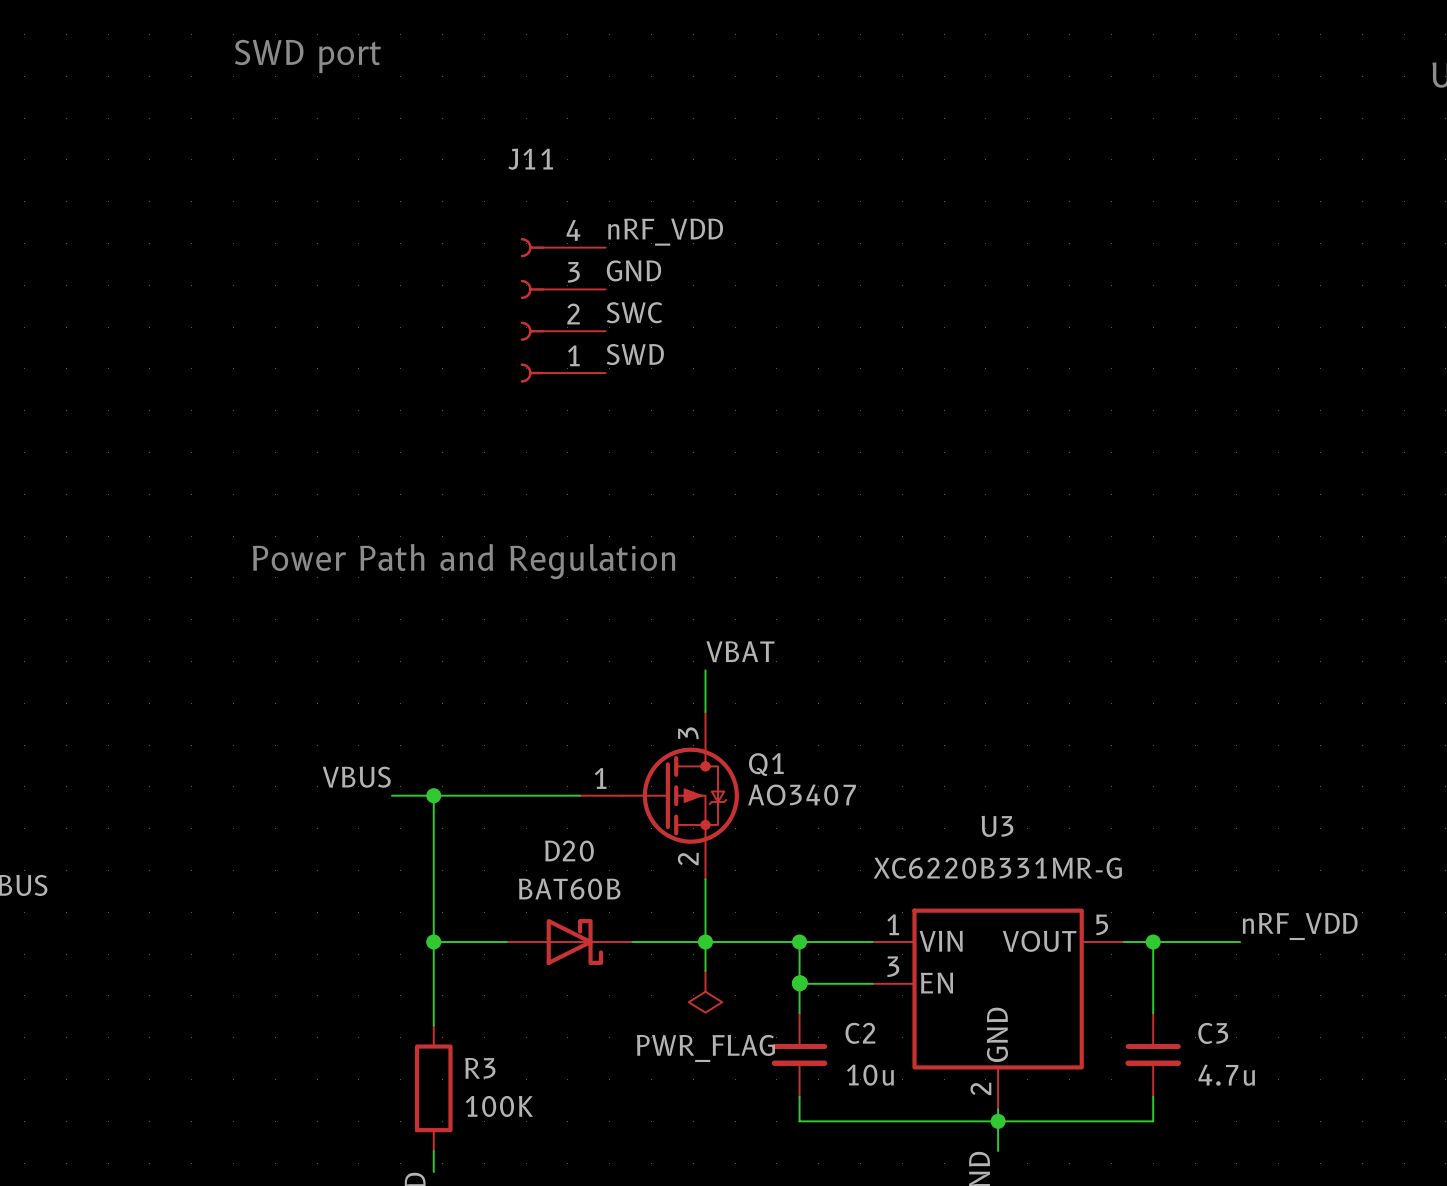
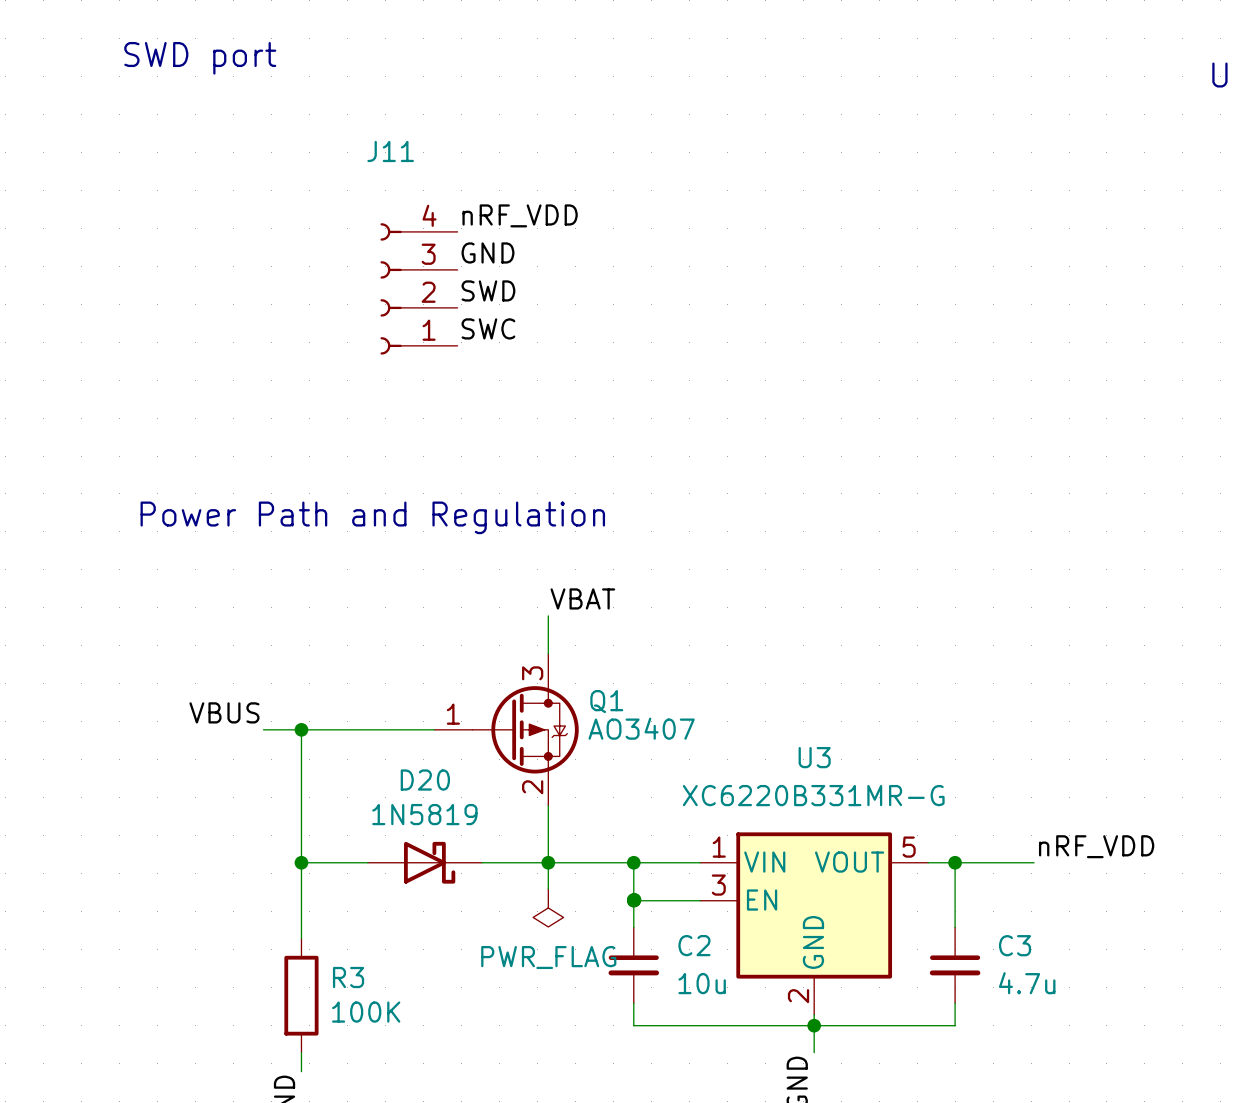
label: SWC (634, 312) -> SWD (488, 290)
label: SWD (635, 354) -> SWC (488, 328)
D20 value: BAT60B (569, 889) -> 1N5819 (424, 814)

